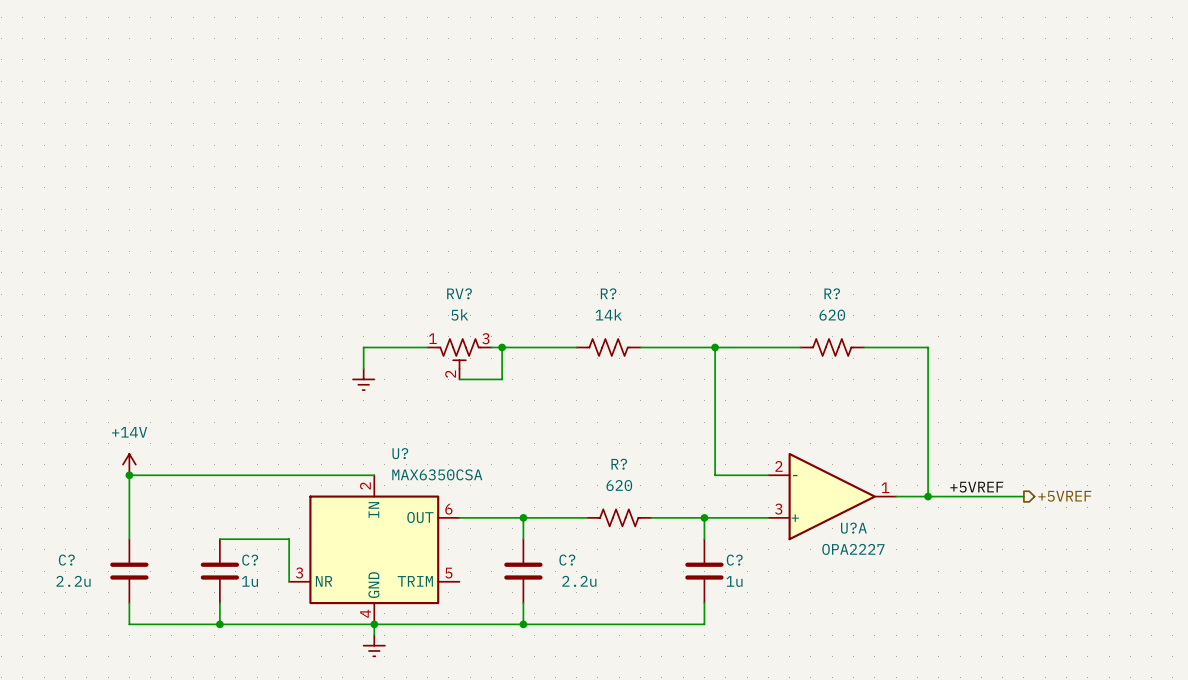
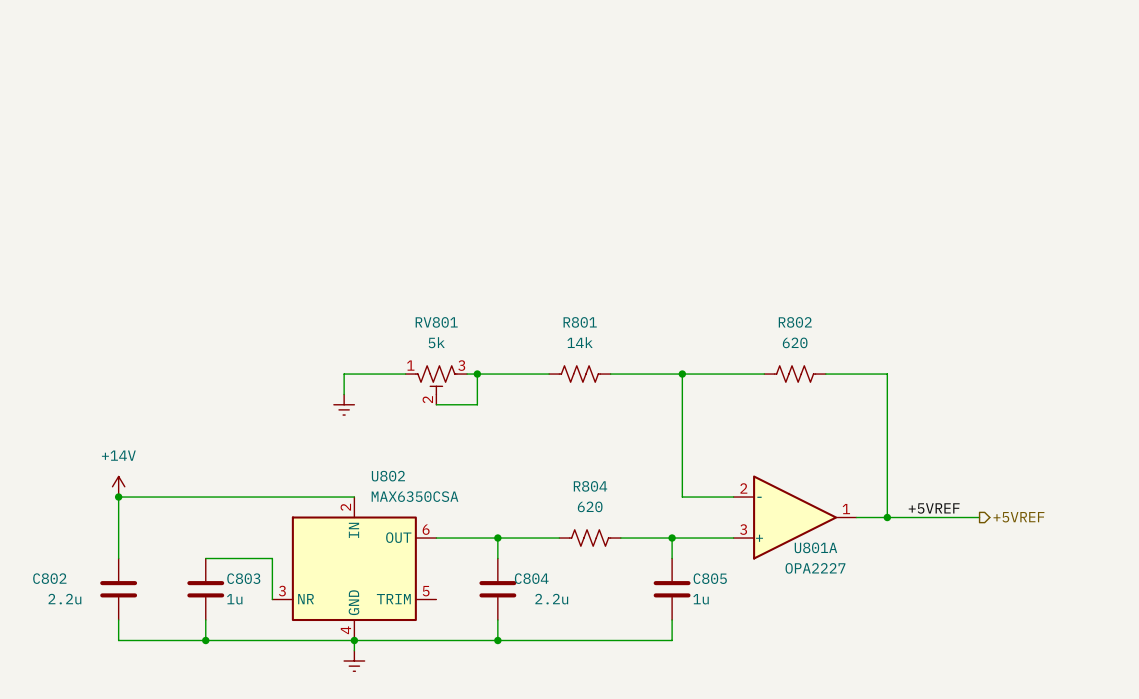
RV? name: RV? (459, 293) -> RV801 (436, 322)
R? name: R? (608, 293) -> R801 (580, 322)
R? name: R? (832, 293) -> R802 (795, 322)
U? name: U? (400, 453) -> U802 (388, 476)
R? name: R? (619, 464) -> R804 (590, 486)
U?A name: U?A (853, 528) -> U801A (815, 547)
C? name: C? (66, 560) -> C802 (49, 578)
C? name: C? (250, 560) -> C803 (243, 578)
C? name: C? (567, 560) -> C804 (531, 578)
C? name: C? (734, 560) -> C805 (710, 578)

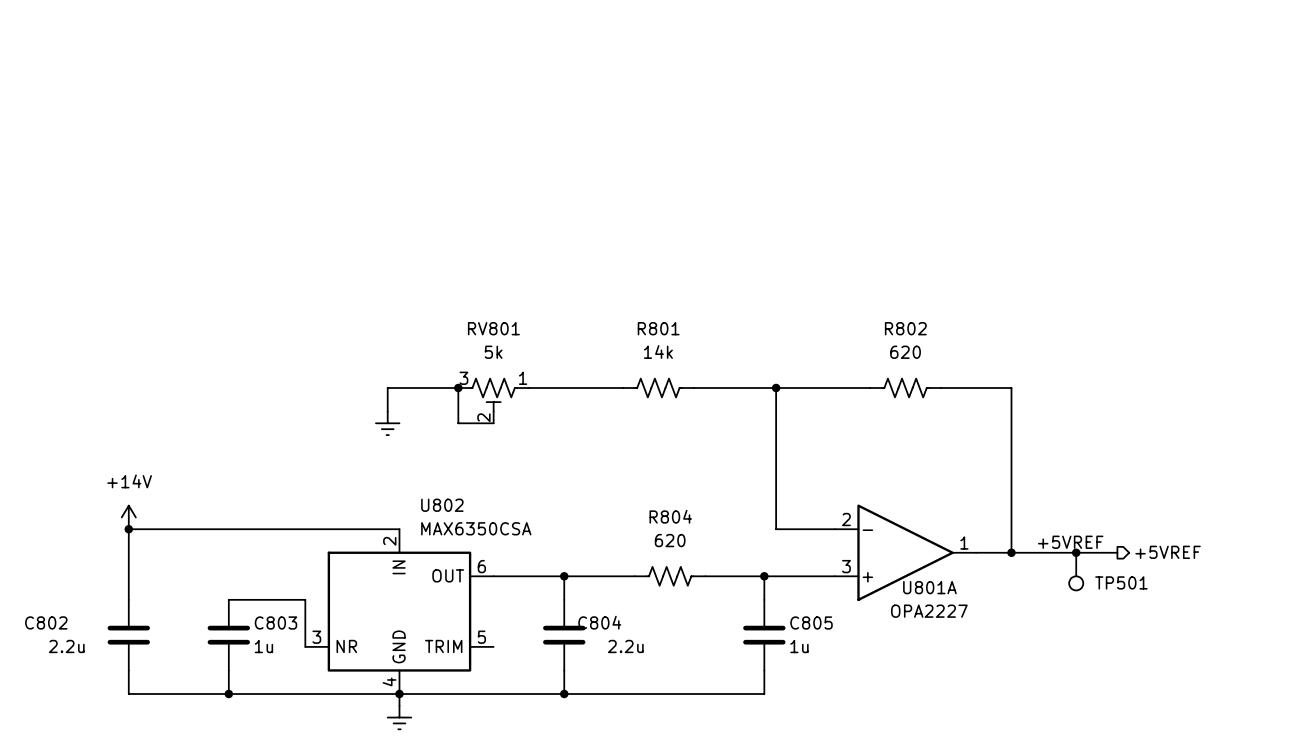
junction: none -> (458, 387)
wire: (477, 374) (477, 404) (436, 404) -> (458, 387) (458, 423) (493, 423)
junction: (477, 374) -> none
RV801 flip: as is (436, 380) -> left-right (493, 395)
junction: none -> (1076, 552)
TP501: none -> (1076, 571)

